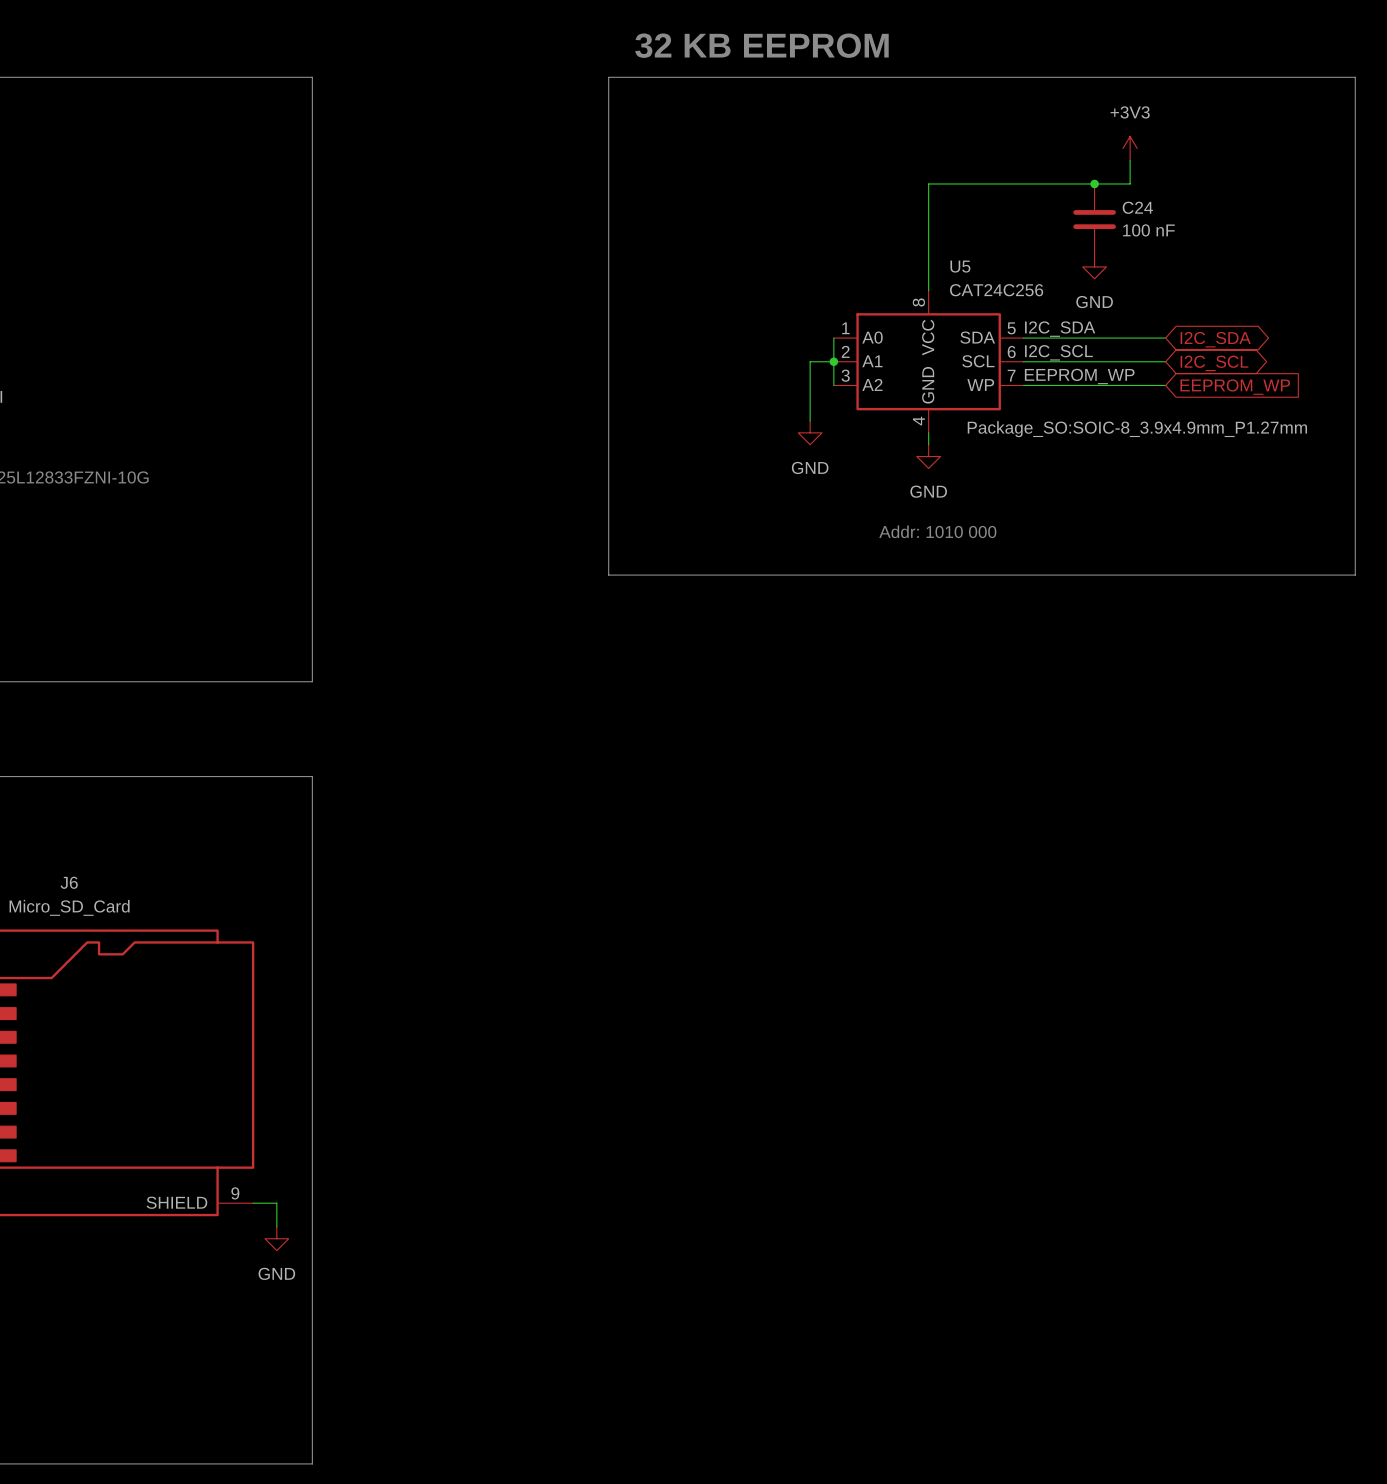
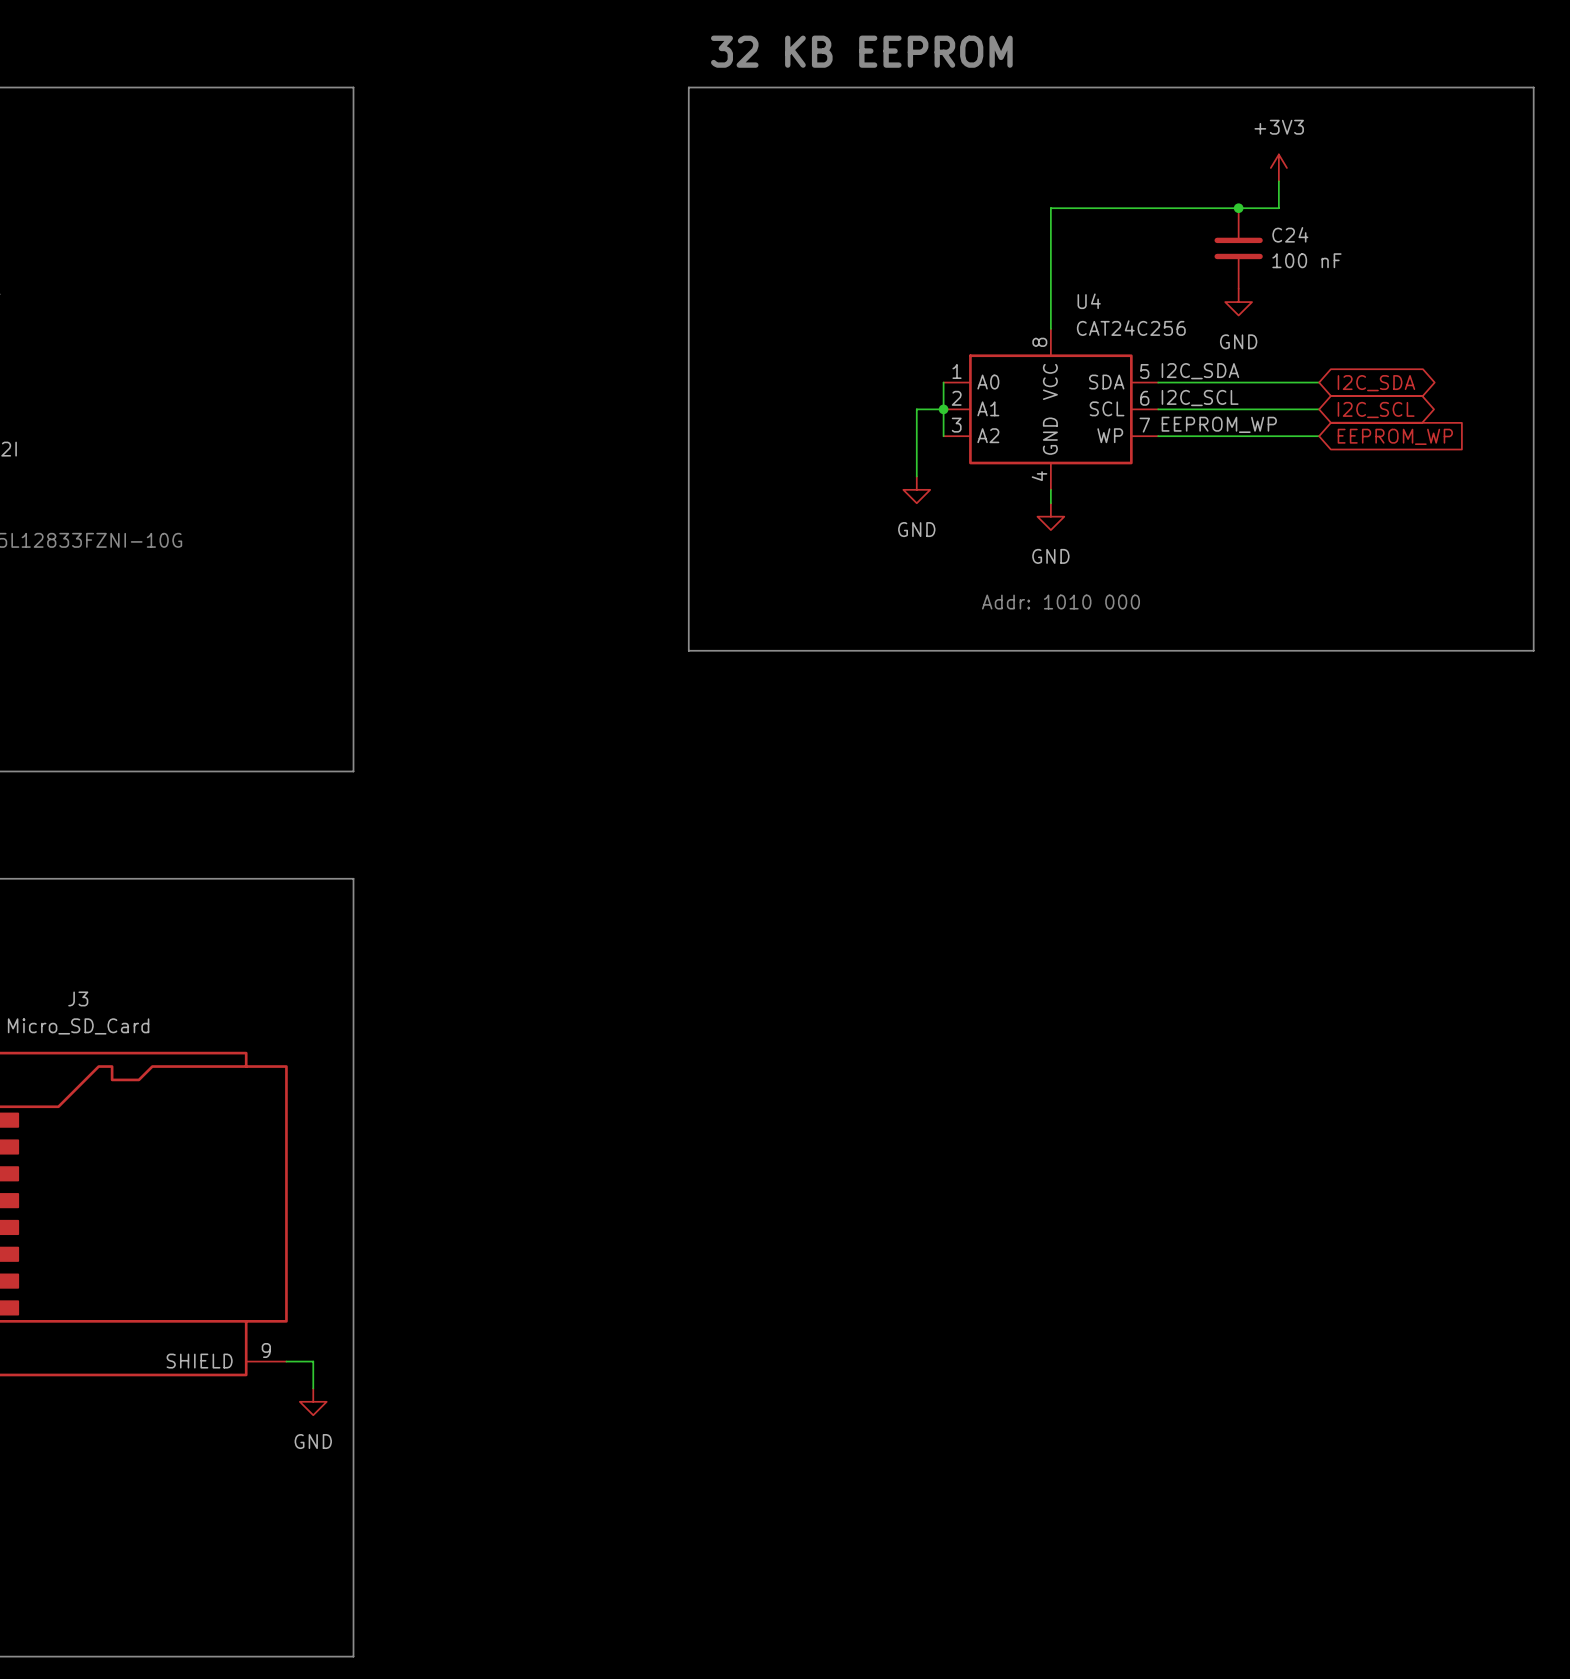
U5 name: U5 (960, 266) -> U4 (1089, 301)
U5 text: Package_SO:SOIC-8_3.9x4.9mm_P1.27mm (1137, 429) -> none
J6 name: J6 (69, 882) -> J3 (78, 998)

